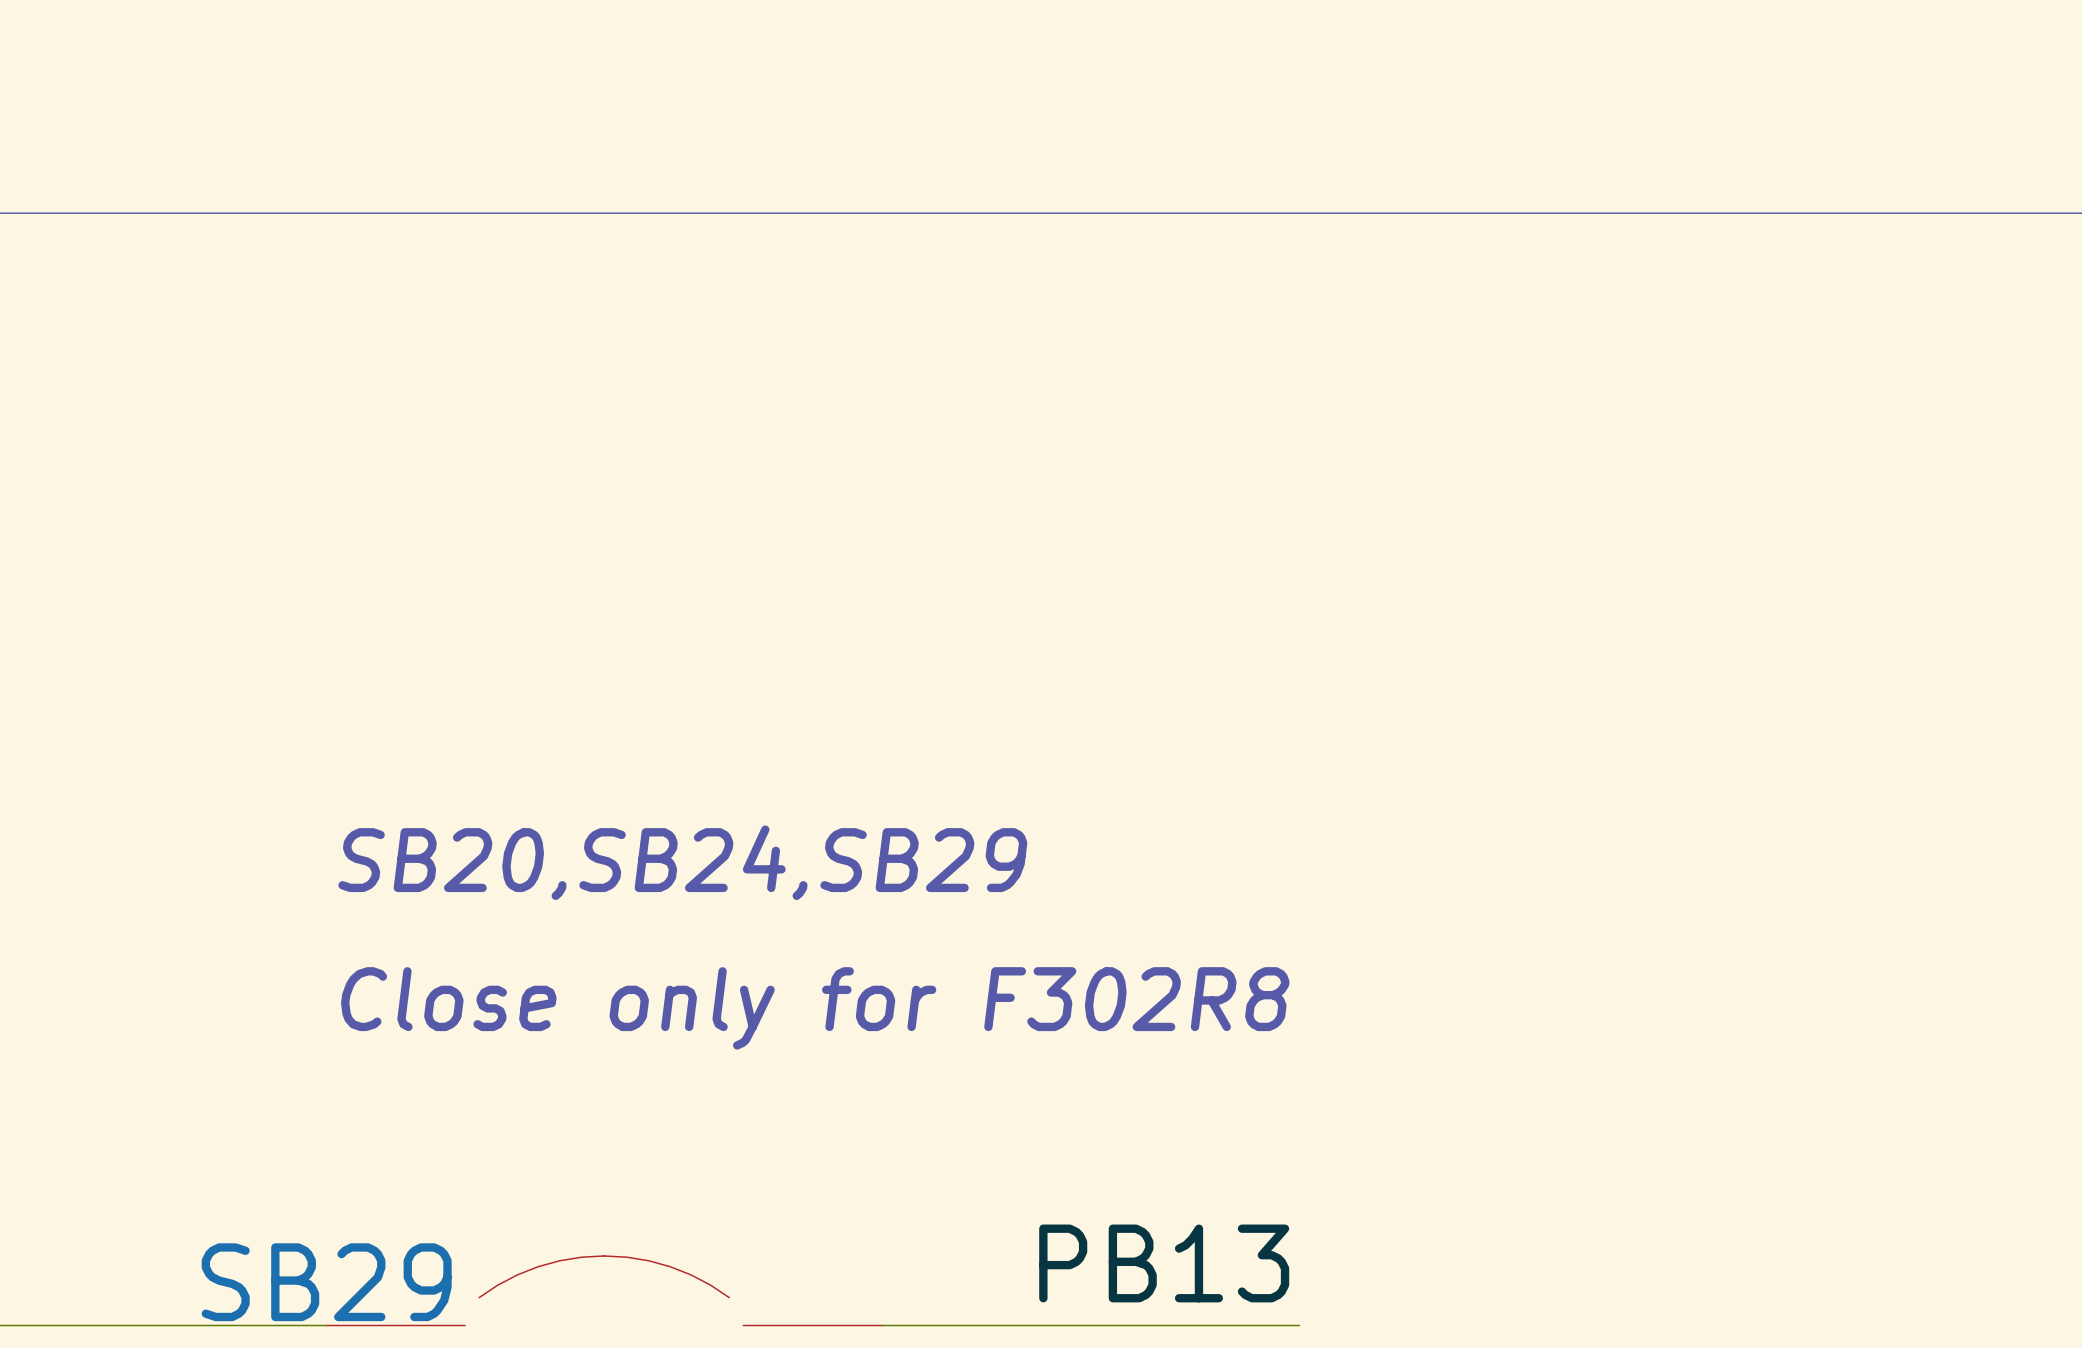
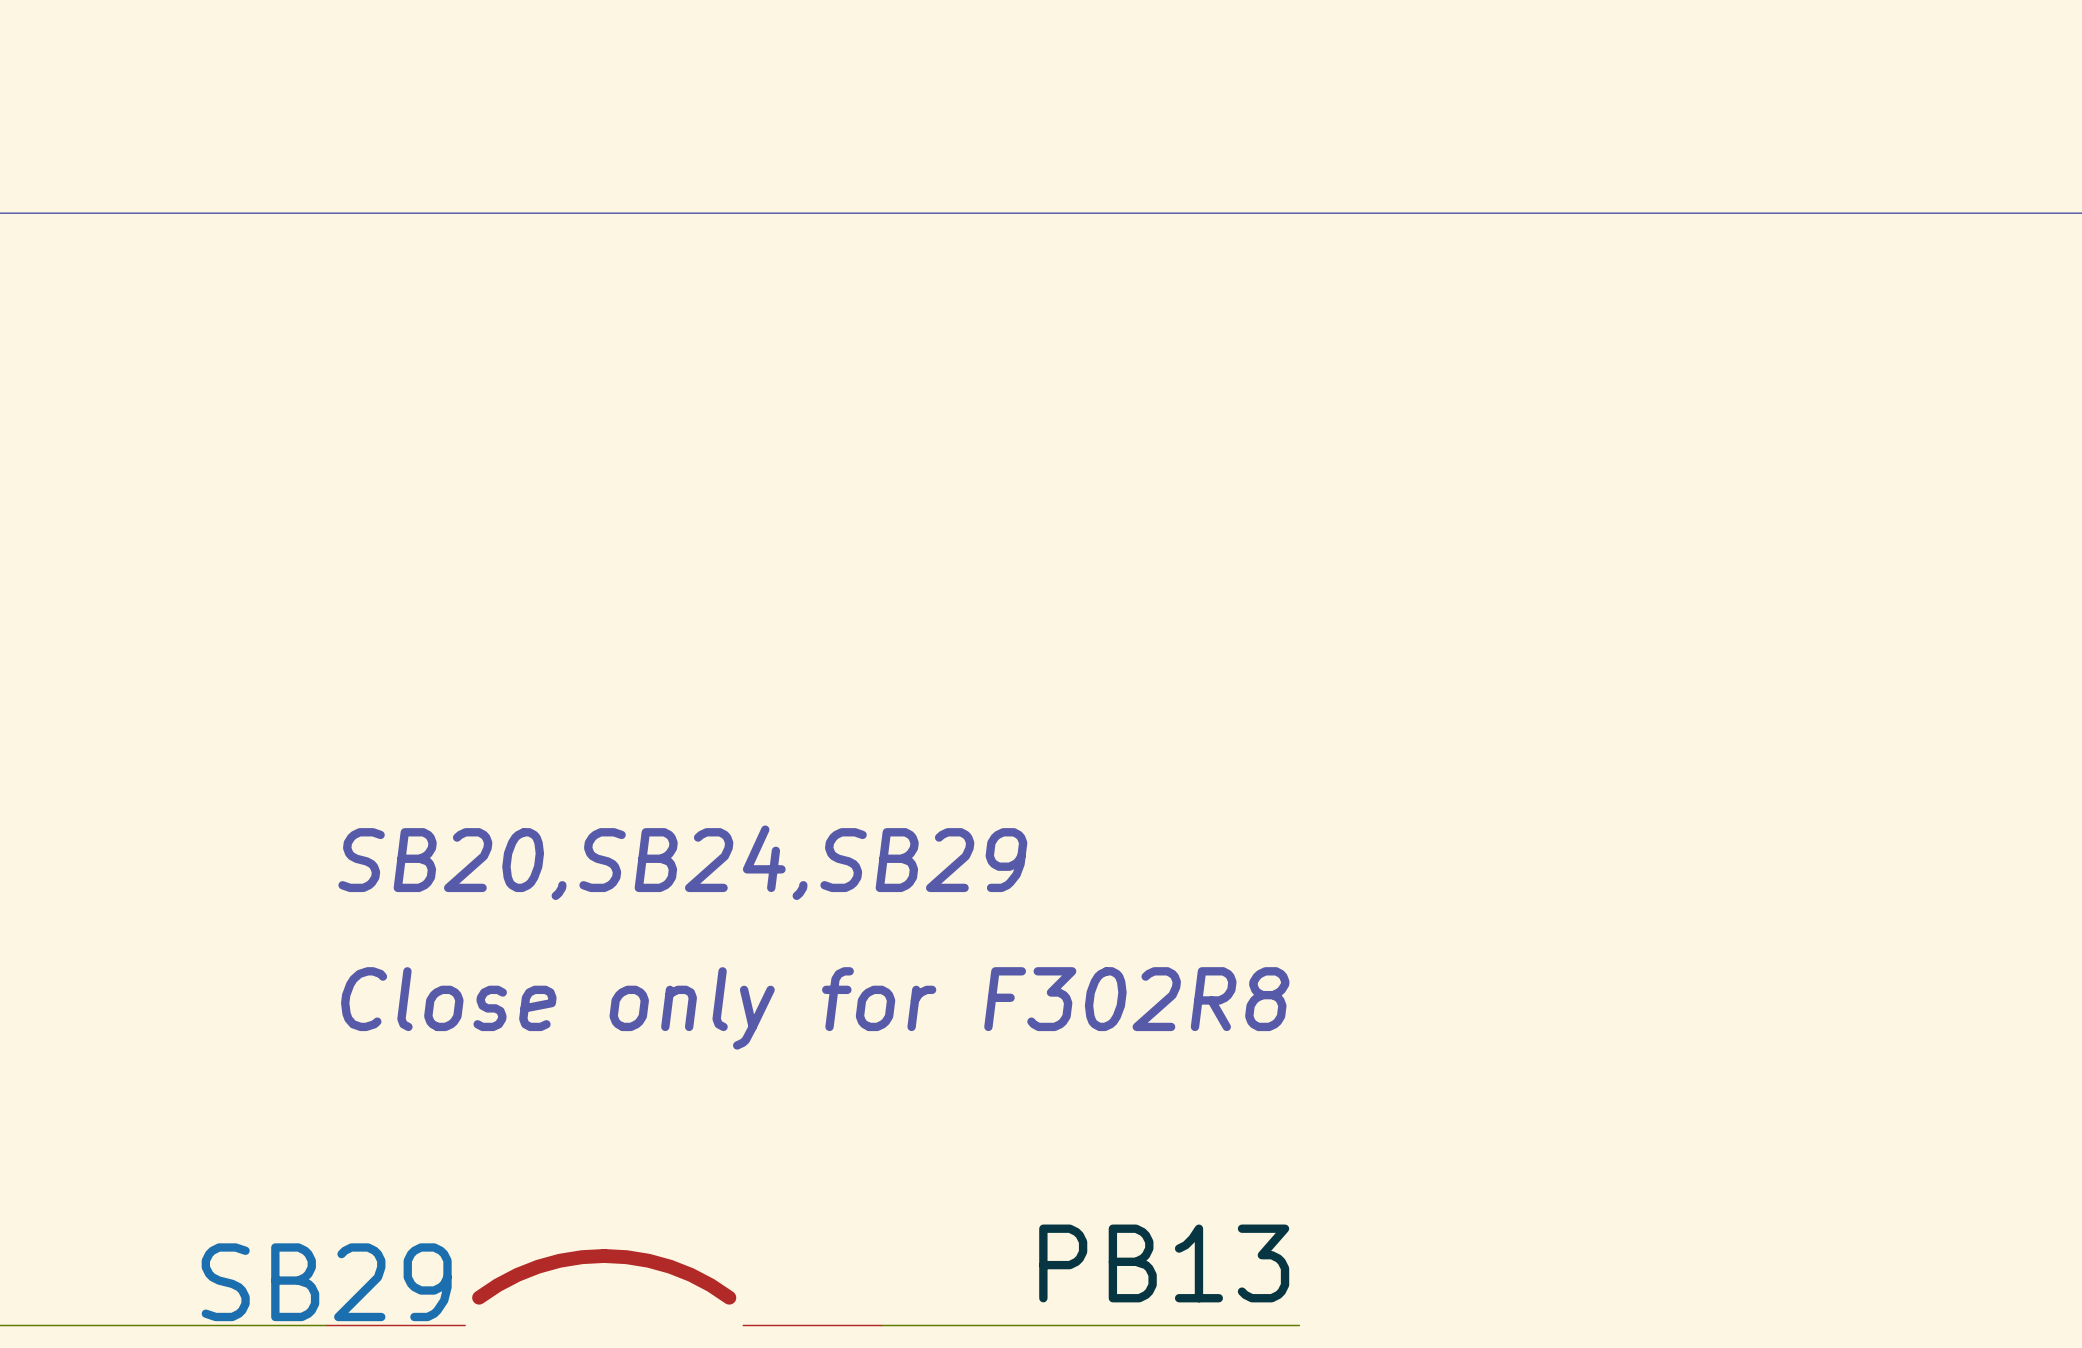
SB29 symbol: [326, 1255, 883, 1326] -> [326, 1249, 883, 1326]

